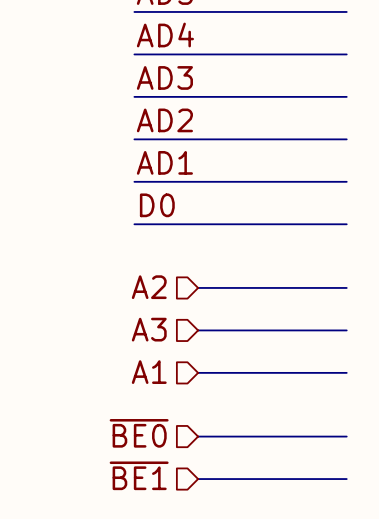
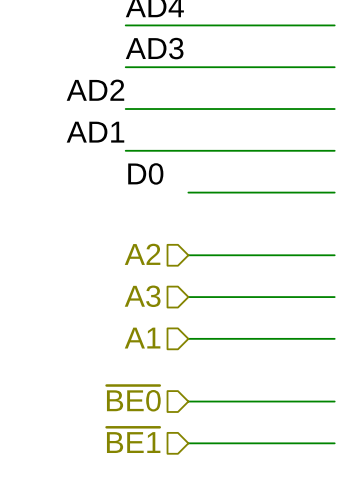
label position: AD2 (164, 120) -> AD2 (95, 90)
label position: AD1 (164, 162) -> AD1 (95, 132)
wire: (134, 224) (198, 224) -> none

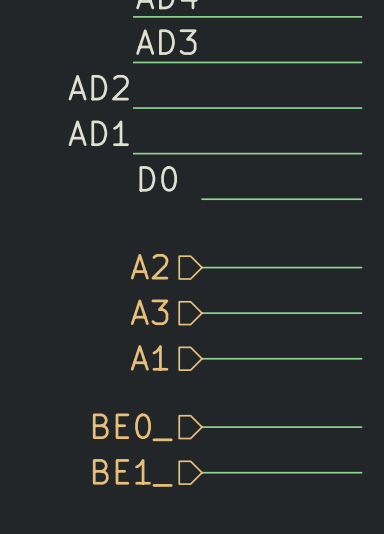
hierarchical label: ~{BE0} (133, 398) -> BE0_ (132, 427)
hierarchical label: ~{BE1} (133, 440) -> BE1_ (132, 472)

